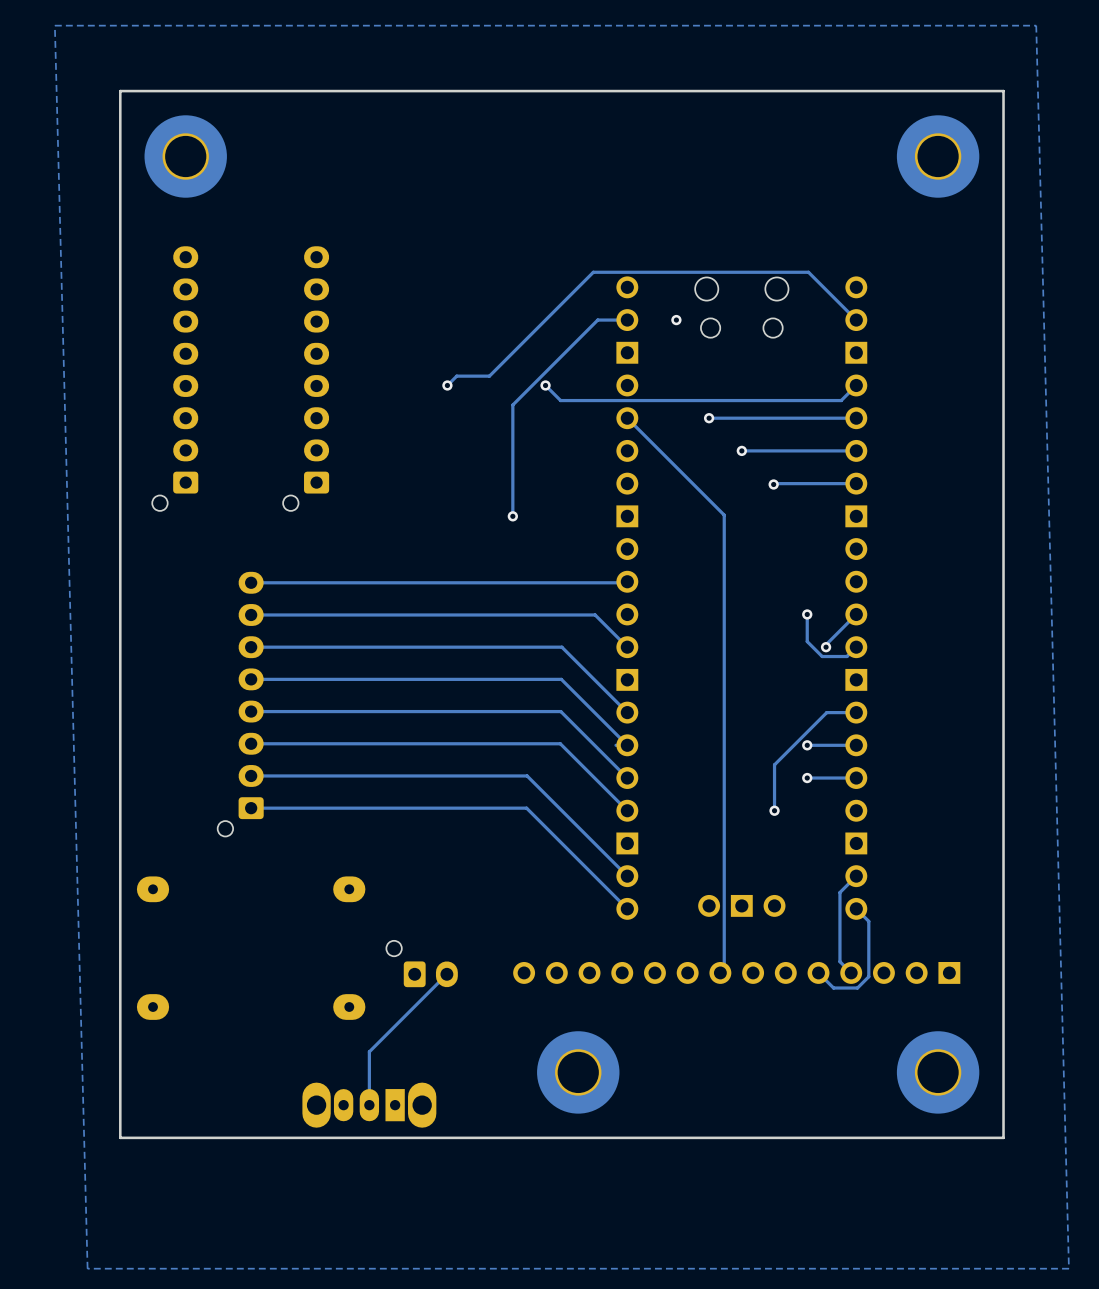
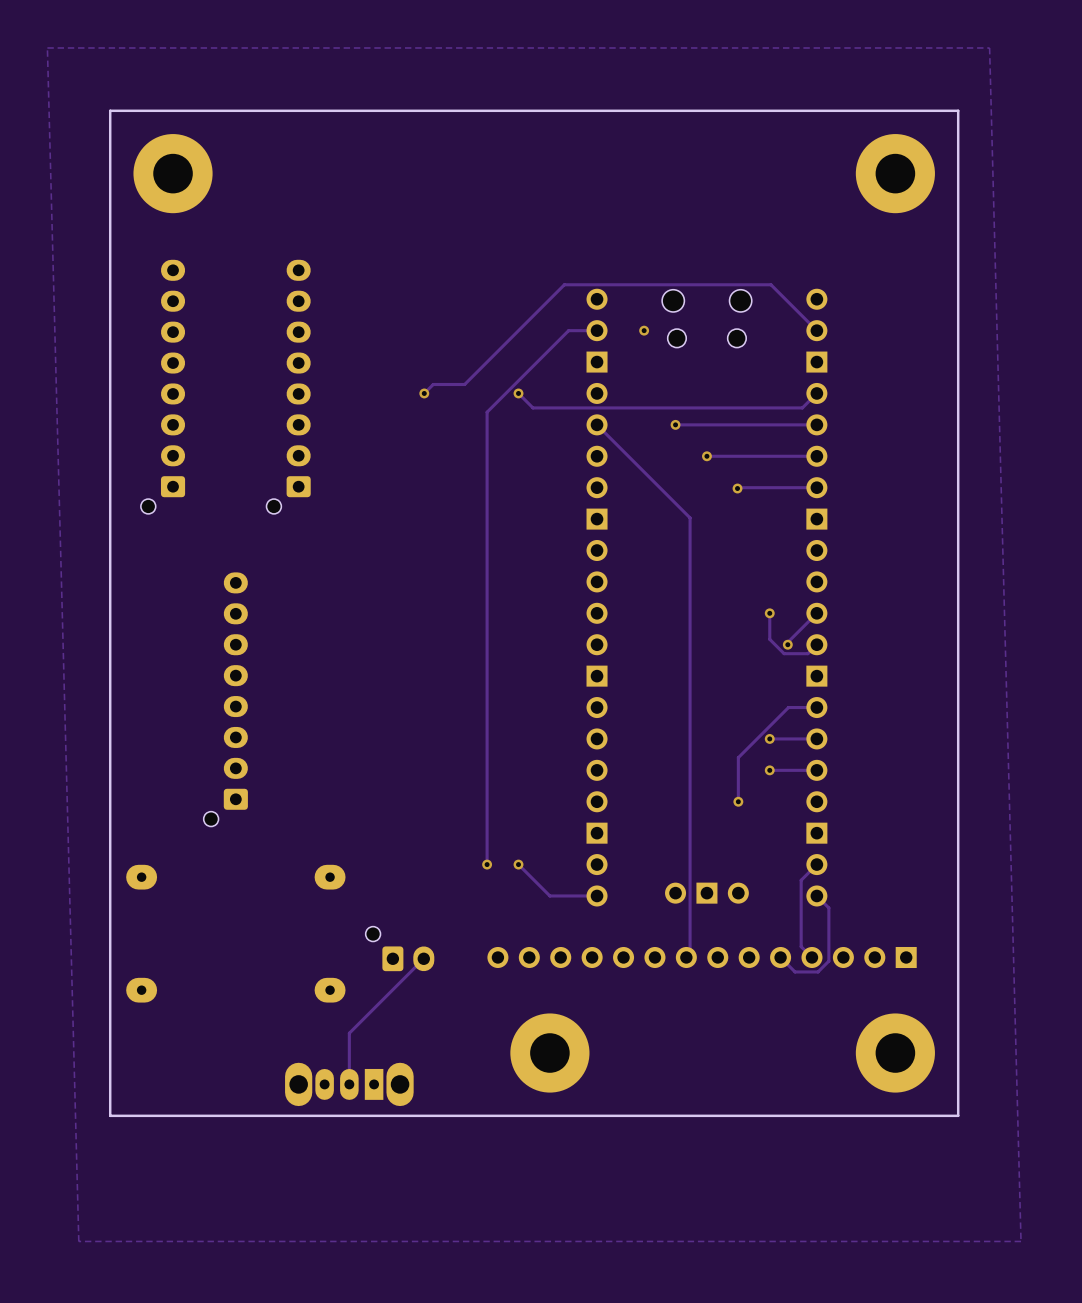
track: none -> (487, 519) (487, 864)
via: (512, 516) -> none
track: (626, 582) (251, 582) -> none
track: (251, 614) (595, 614) (627, 647) -> none
track: (251, 647) (561, 647) (627, 712) -> none
track: (251, 679) (561, 679) (627, 745) (616, 745) -> none
track: (251, 711) (560, 711) (627, 778) -> none
track: (251, 743) (560, 743) (627, 810) -> none
track: (251, 775) (527, 775) (627, 876) -> none
track: (251, 808) (526, 808) (627, 908) -> (518, 864) (549, 895) (597, 895)
via: none -> (487, 864)
via: none -> (518, 864)

